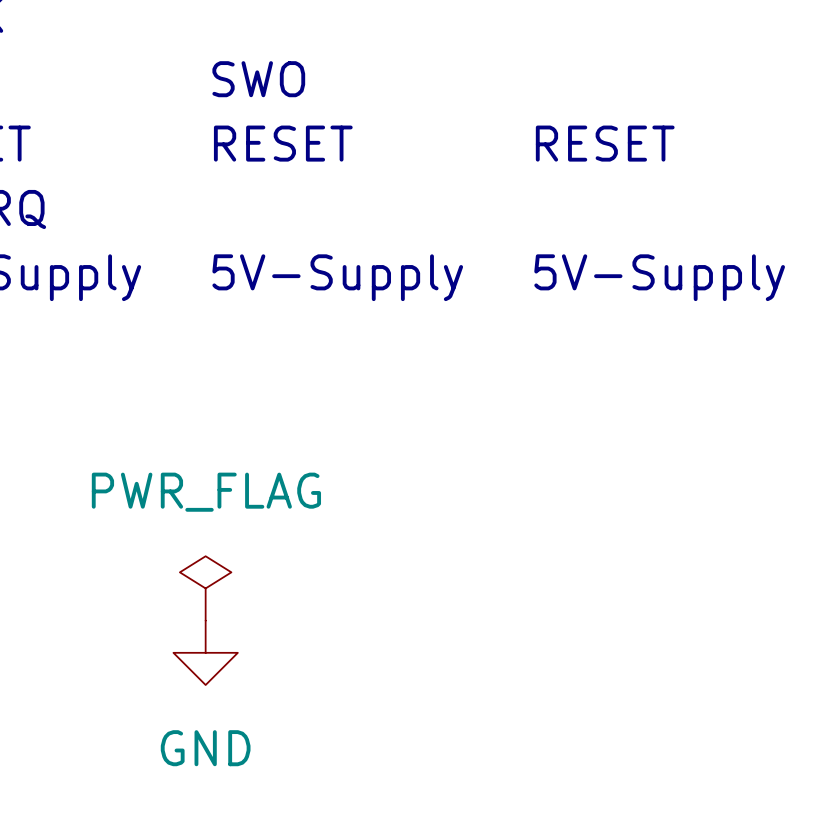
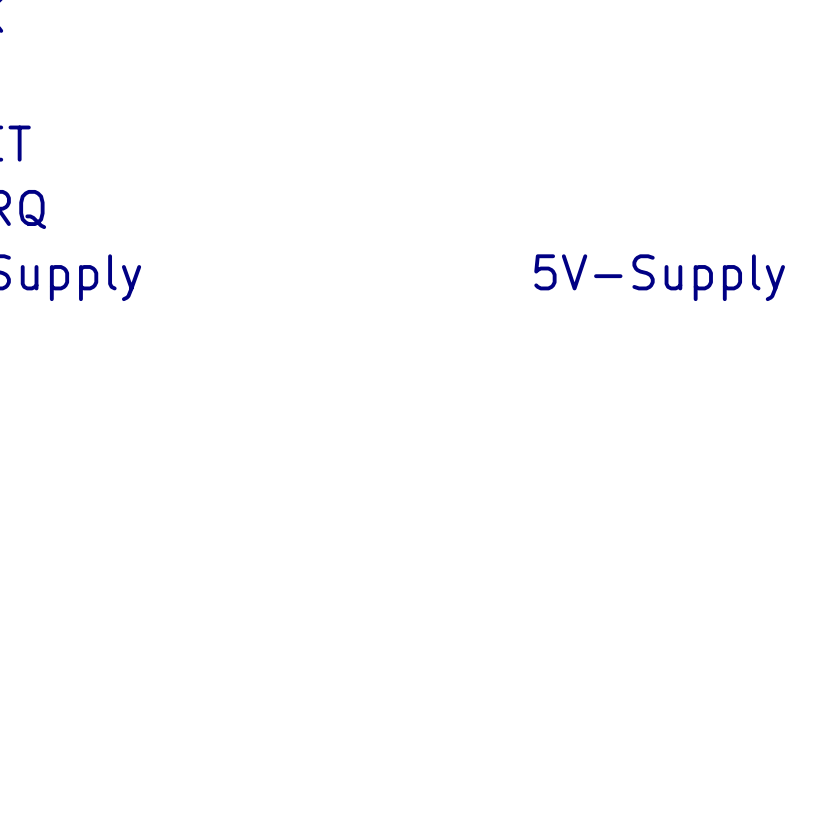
text: SWO (258, 79) -> none
text: RESET (283, 143) -> none
text: RESET (605, 143) -> none
text: 5V-Supply (337, 277) -> none
power symbol: PWR_FLAG (205, 588) -> none
power symbol: GND (205, 652) -> none

